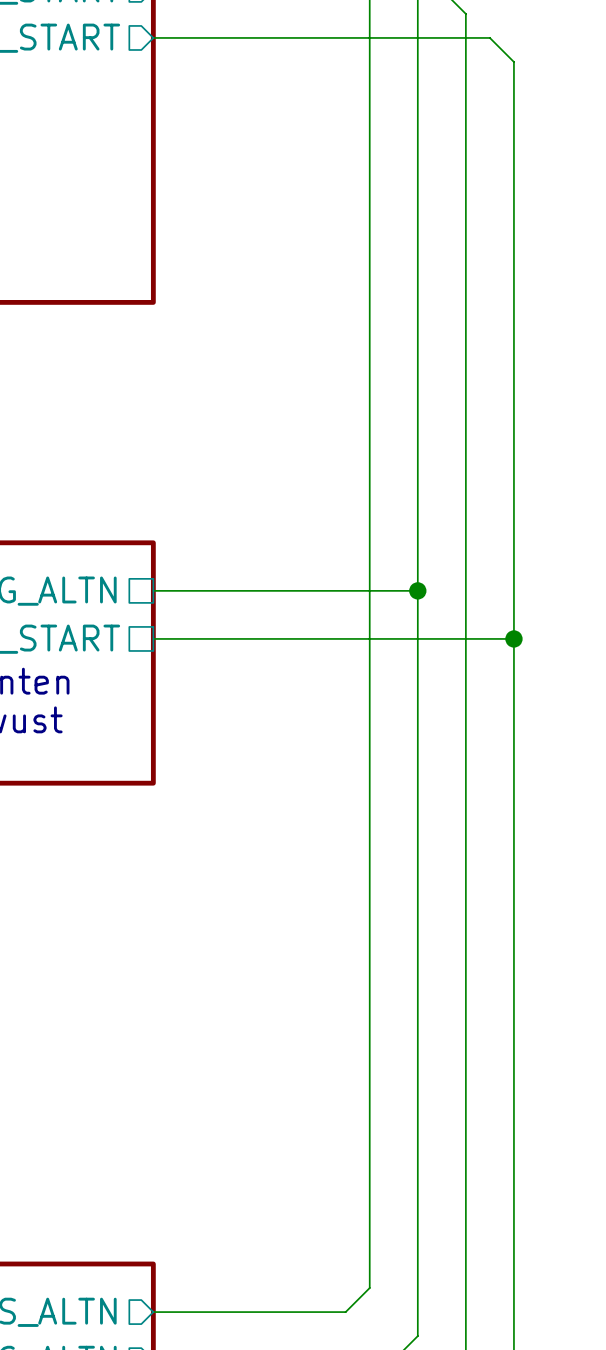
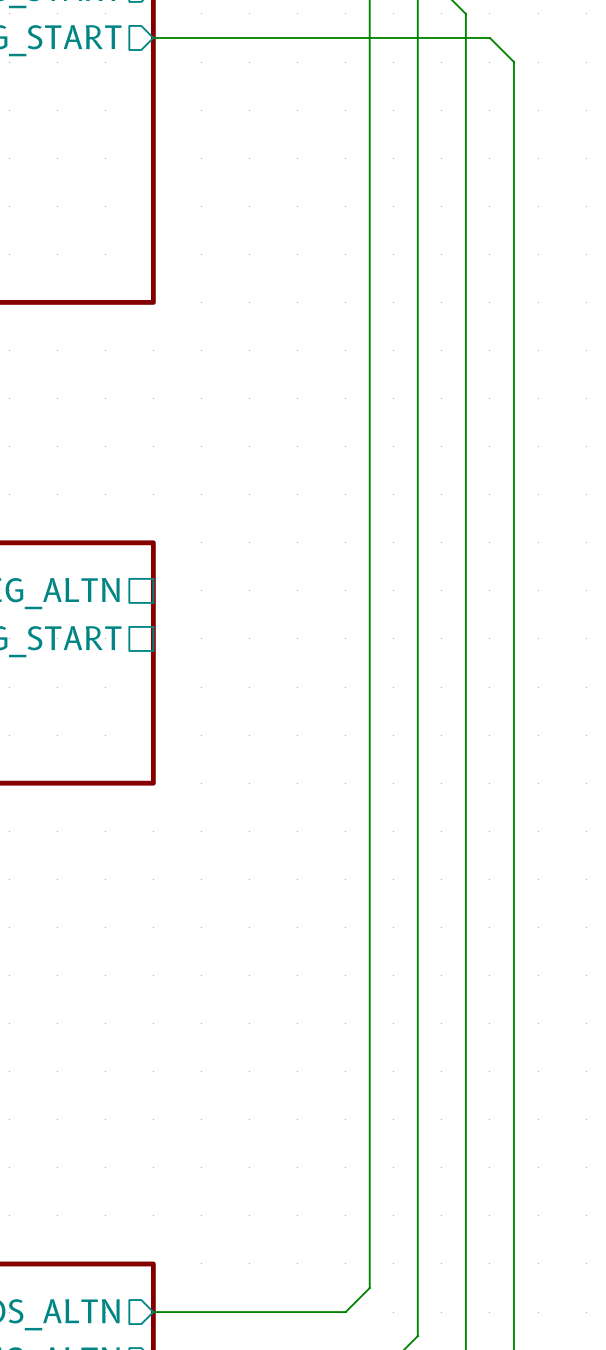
wire: (153, 590) (417, 590) -> none
junction: (417, 590) -> none
wire: (153, 638) (513, 638) -> none
junction: (513, 638) -> none

